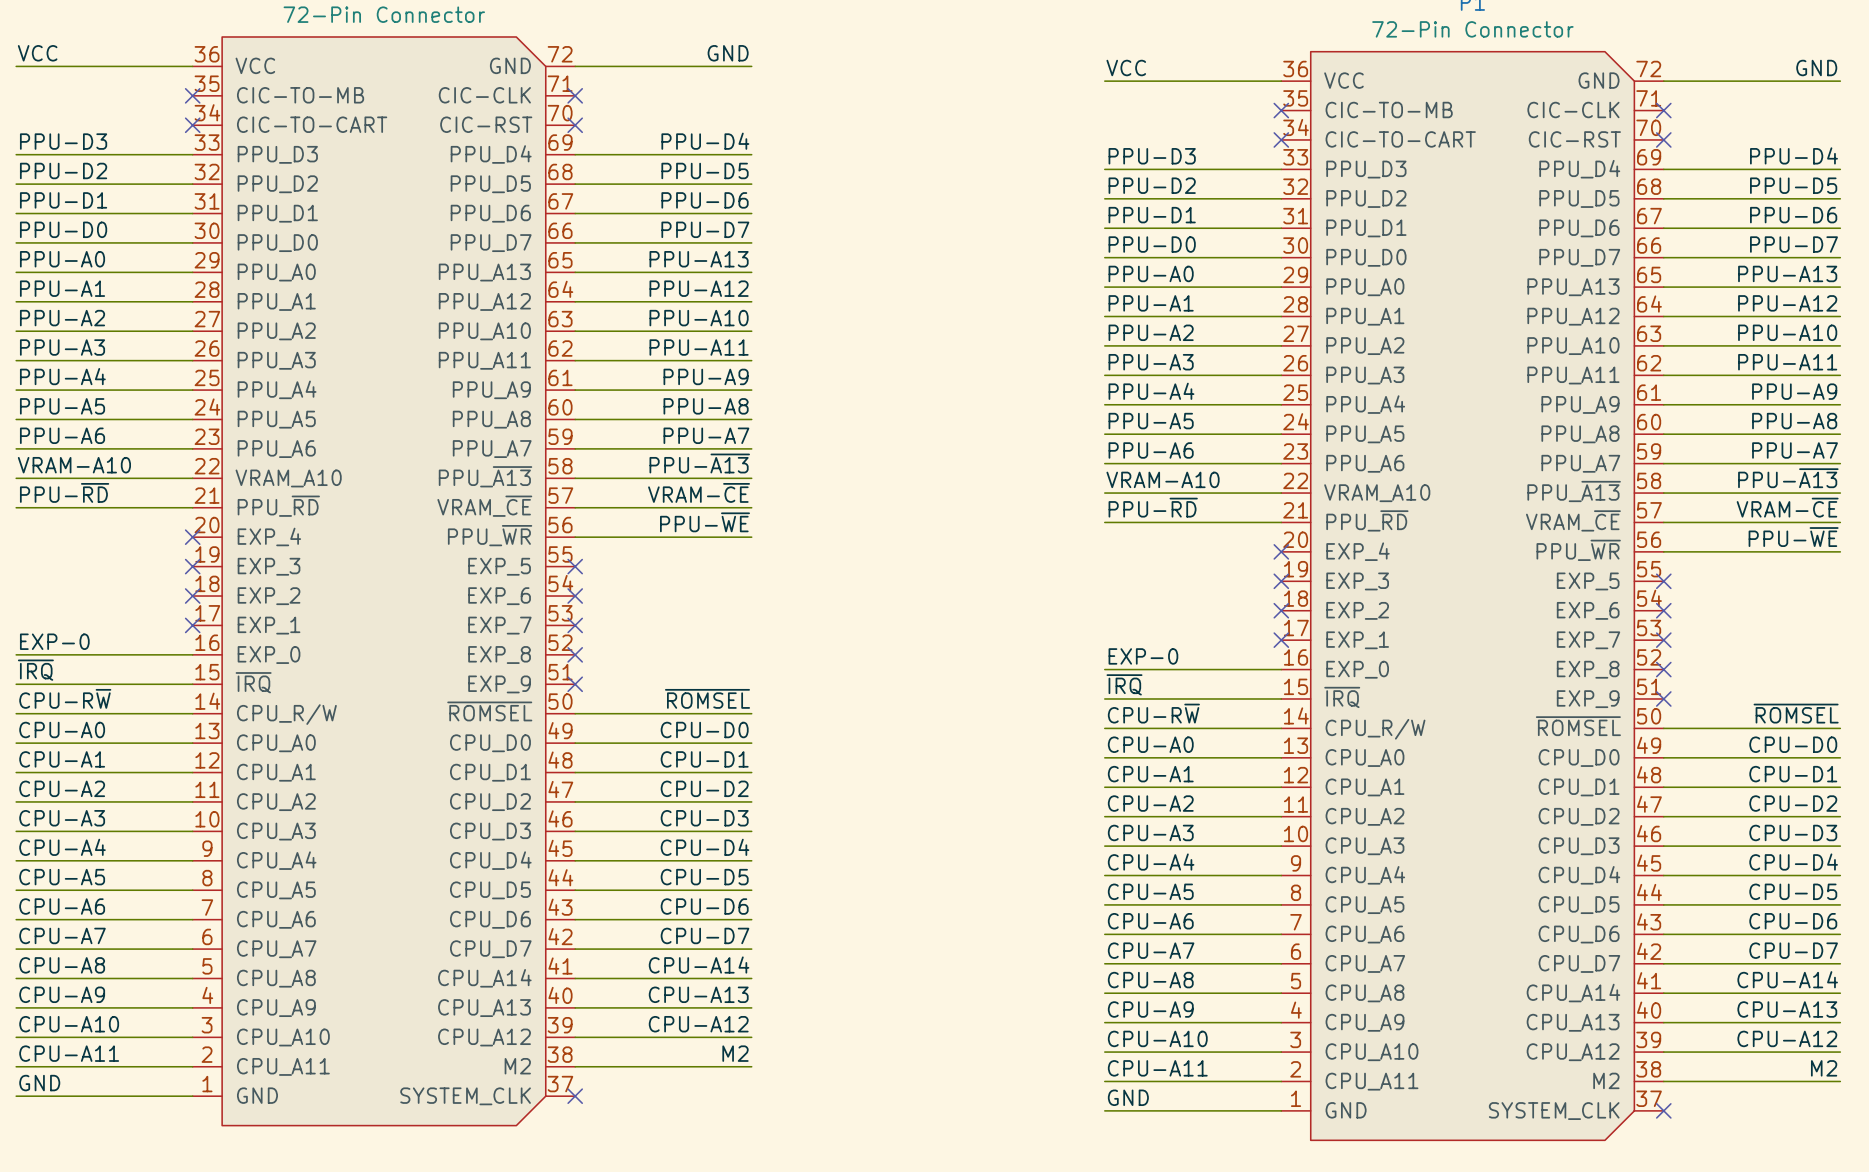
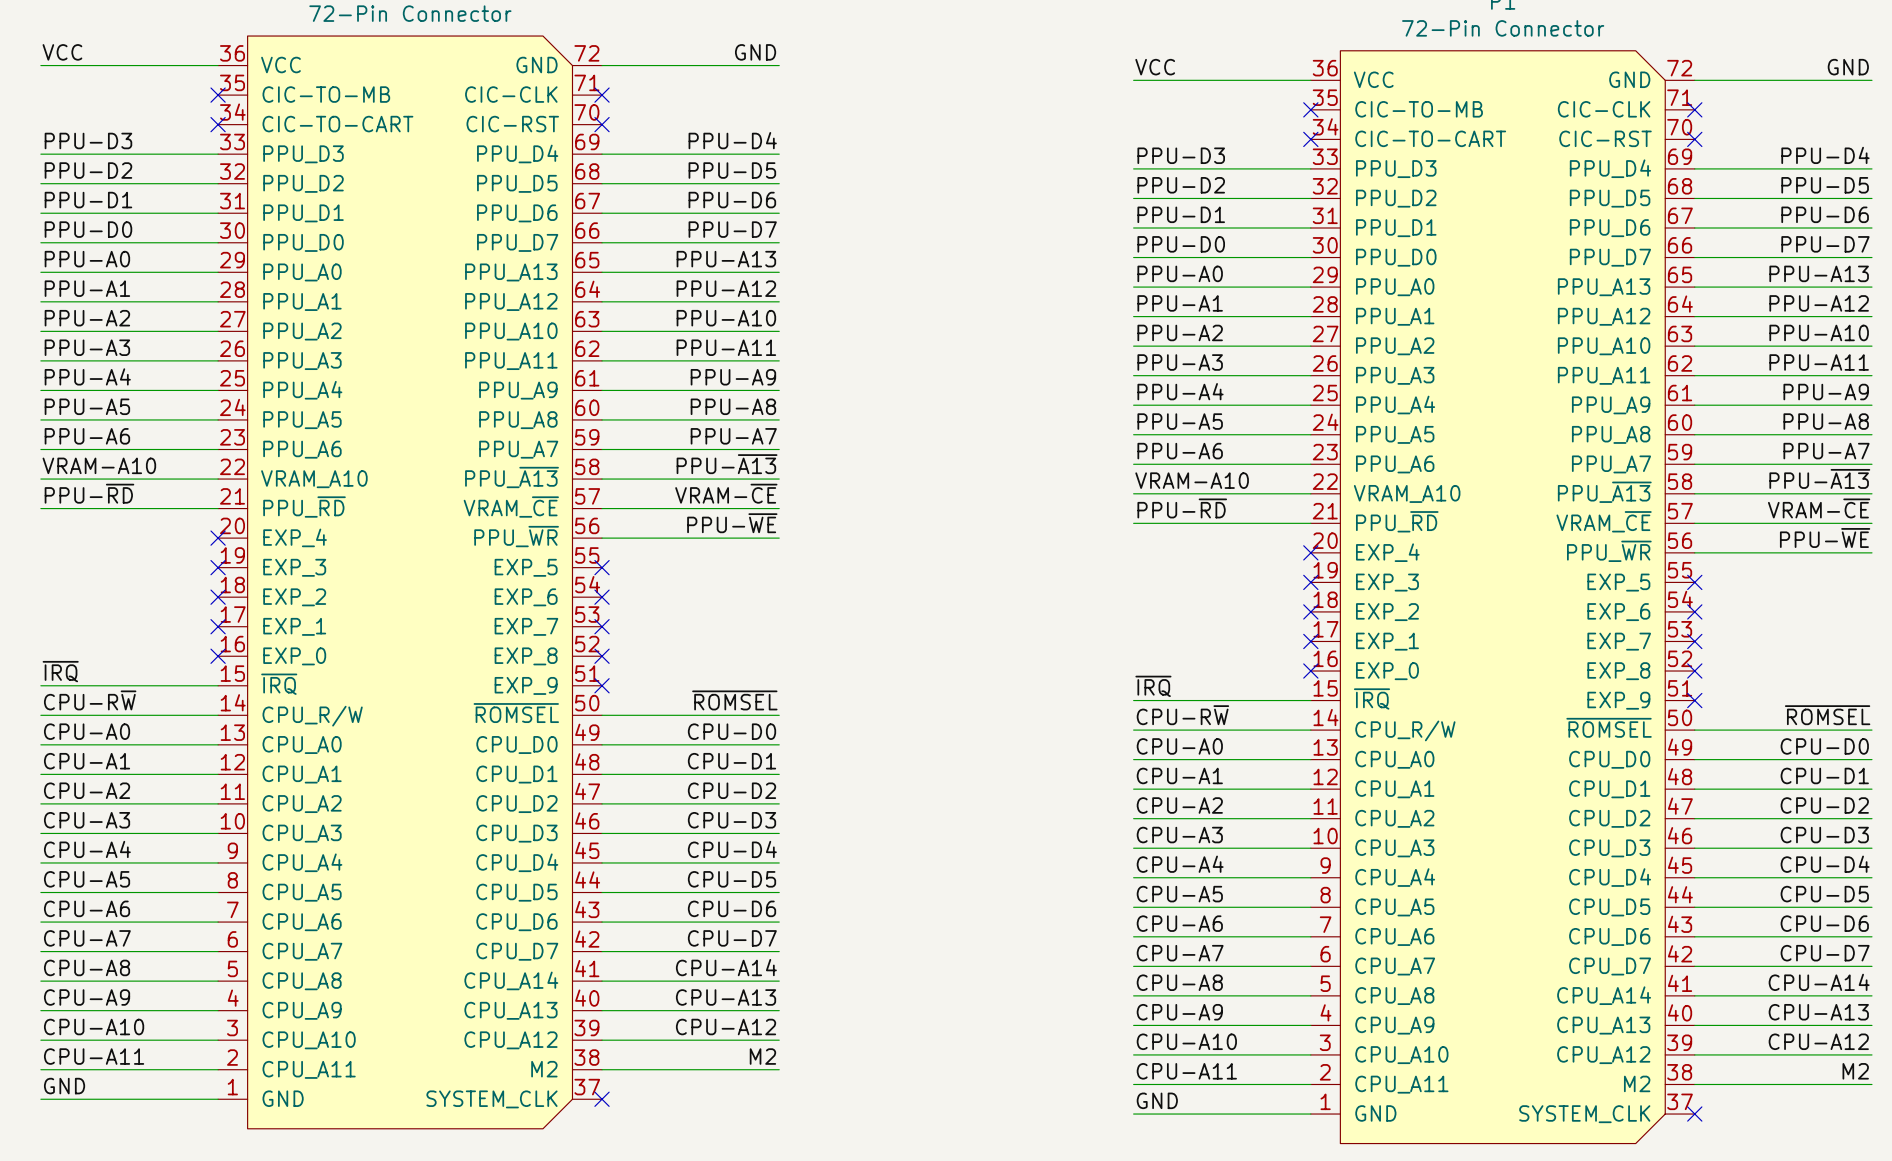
label: EXP-0 (54, 641) -> none
wire: (16, 654) (192, 654) -> none
no-connect mark: none -> (218, 656)
label: EXP-0 (1143, 656) -> none
wire: (1104, 669) (1281, 669) -> none
no-connect mark: none -> (1310, 671)

